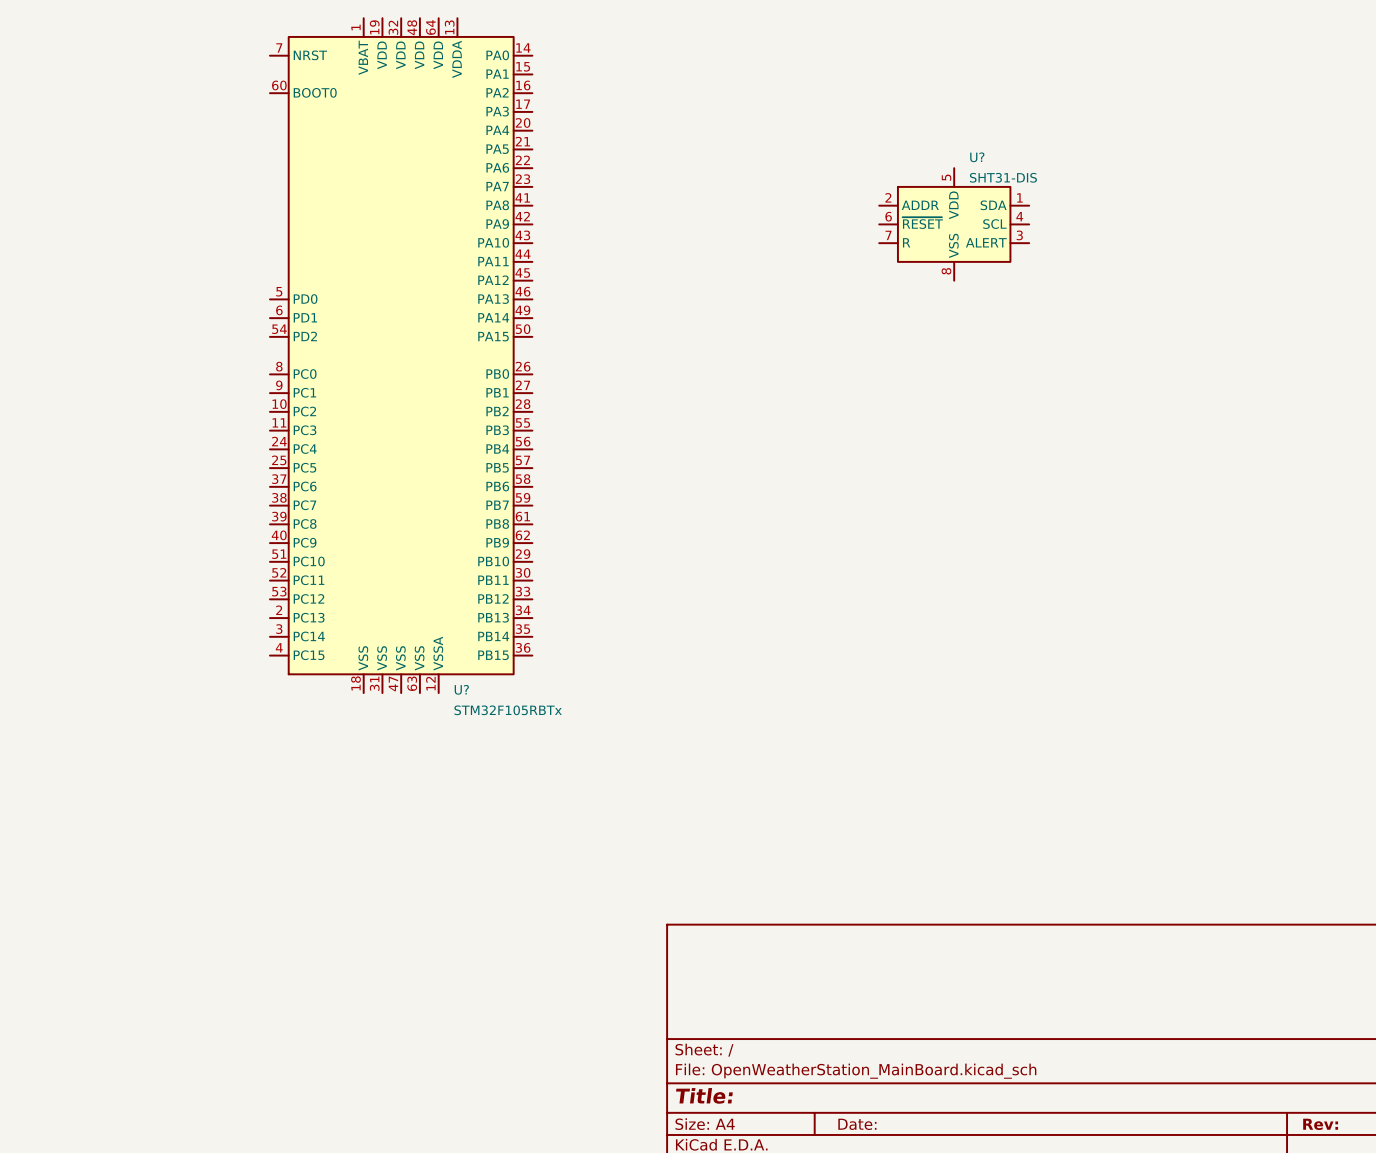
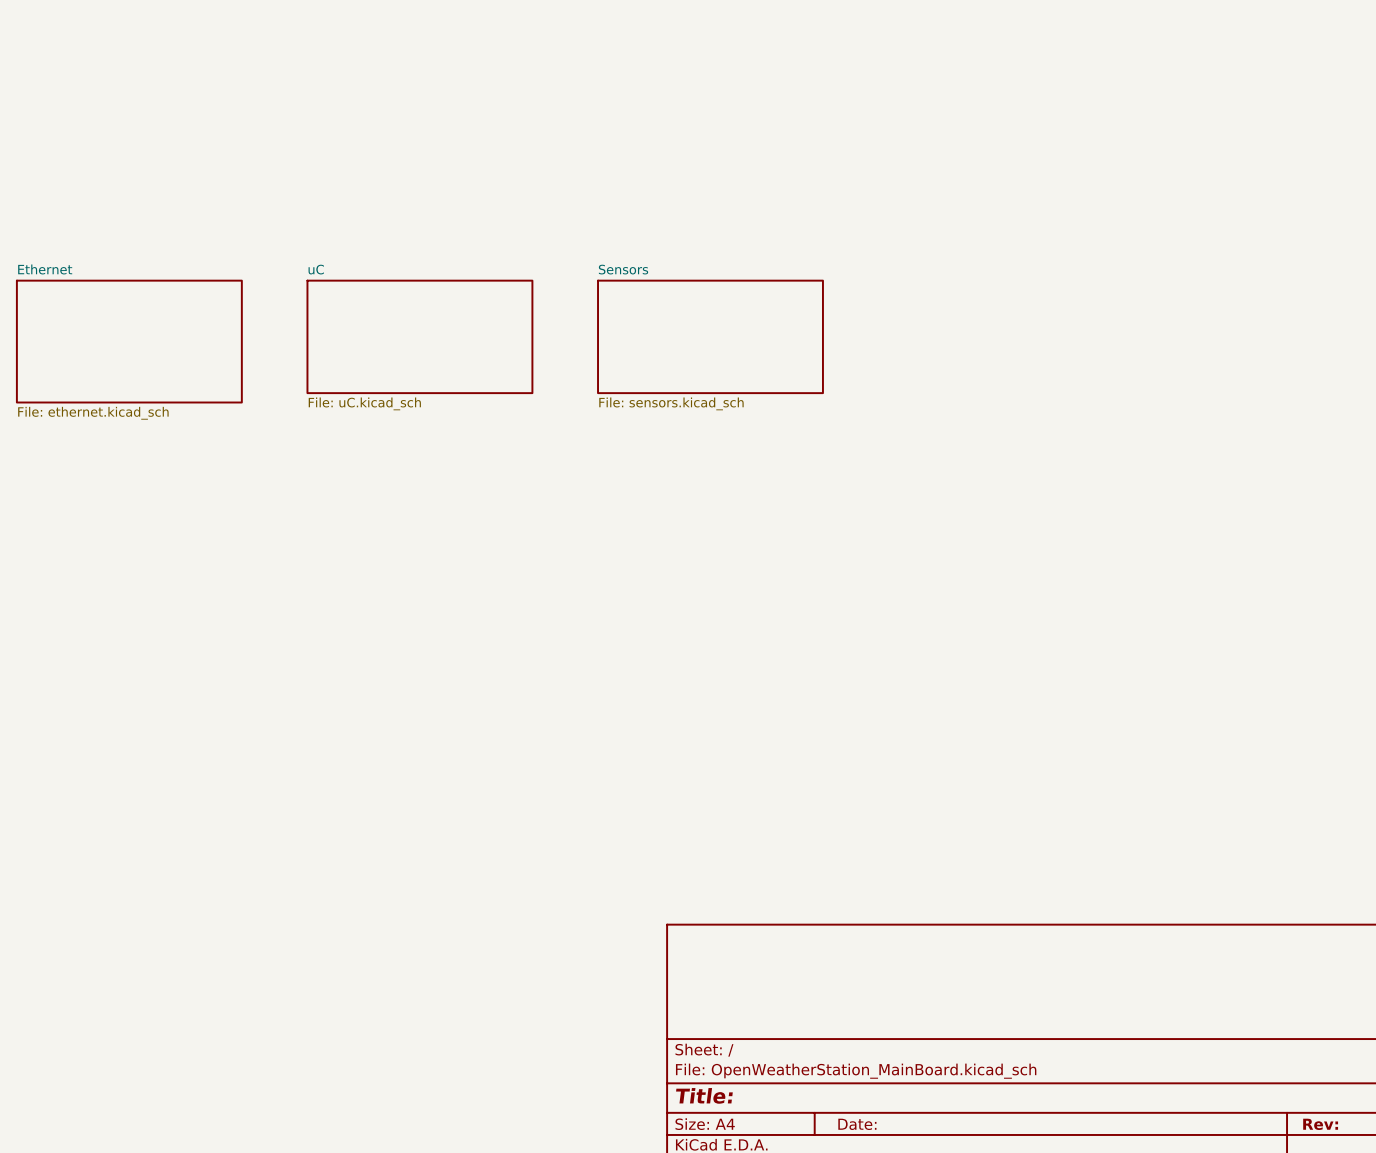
U?: SHT31-DIS (954, 224) -> none
sheet uC: none -> File: uC.kicad_sch (419, 336)
sheet Sensors: none -> File: sensors.kicad_sch (710, 336)
sheet Ethernet: none -> File: ethernet.kicad_sch (129, 341)
U?: STM32F105RBTx (401, 355) -> none

